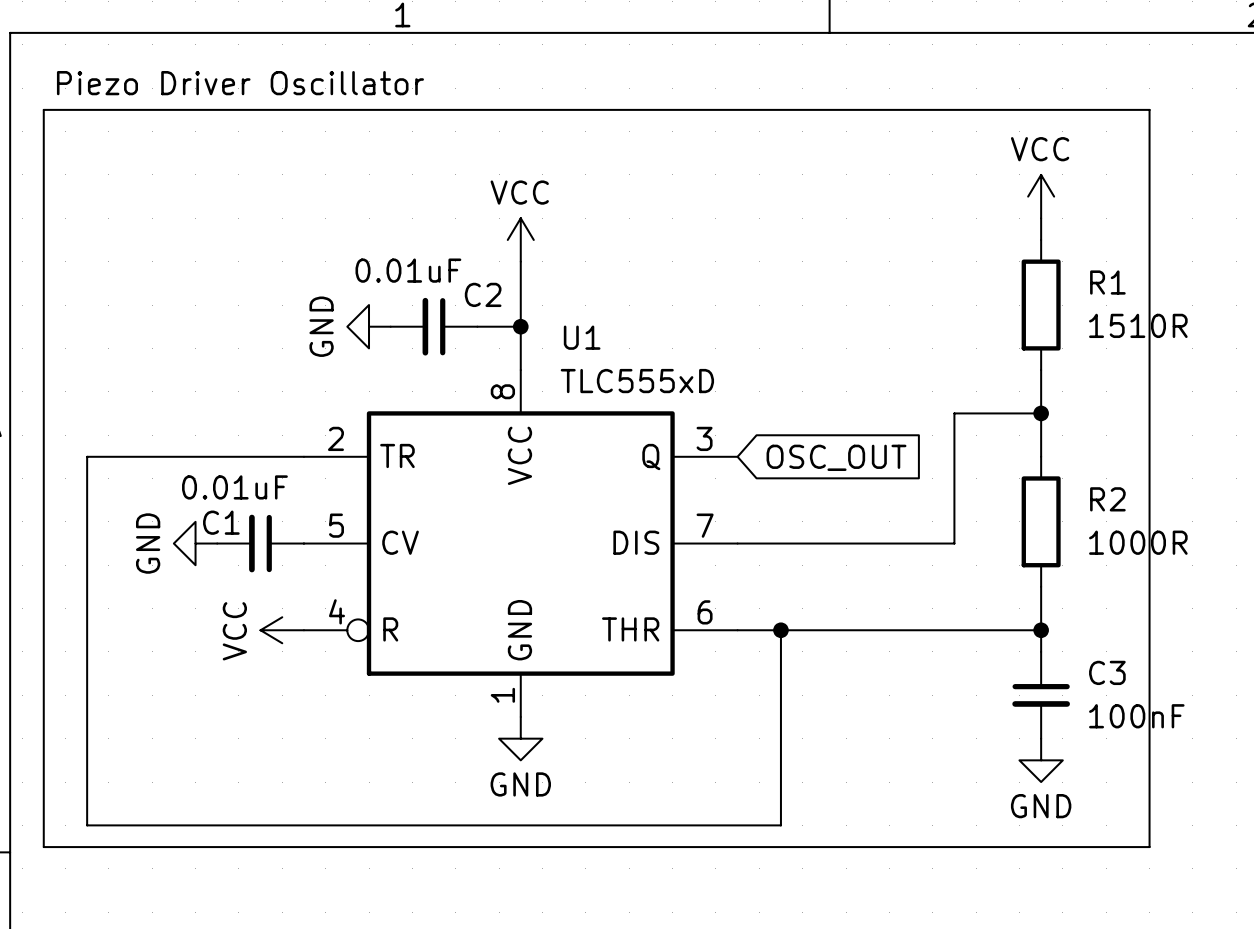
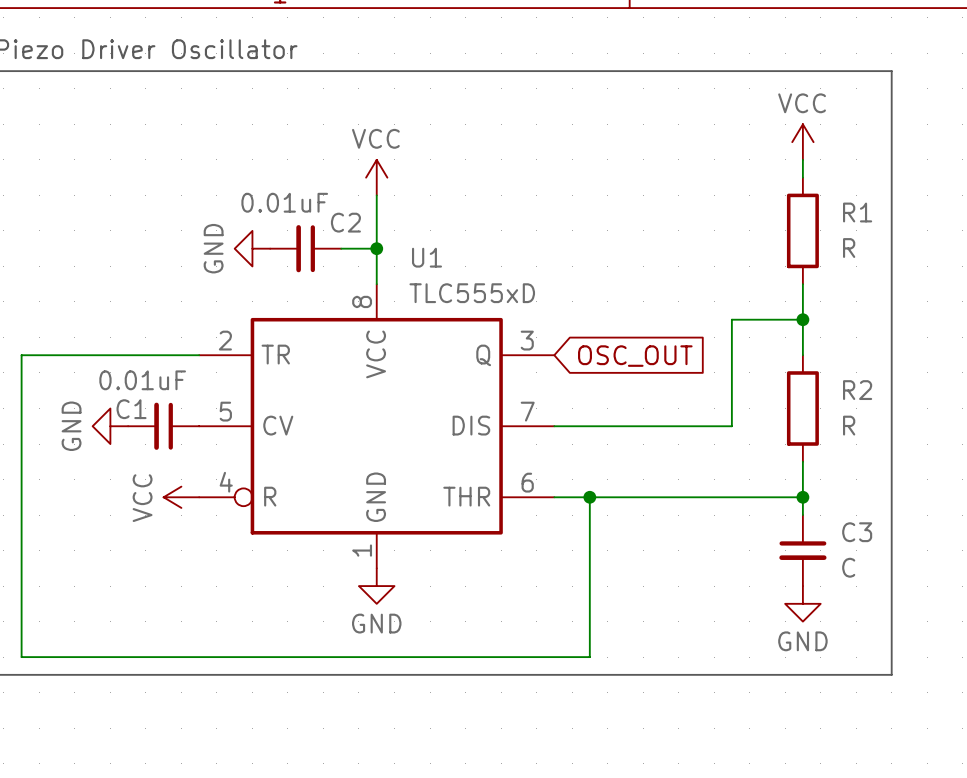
R1 value: 1510R (1138, 325) -> R (849, 248)
R2 value: 1000R (1138, 542) -> R (849, 425)
C3 value: 100nF (1136, 716) -> C (848, 567)

